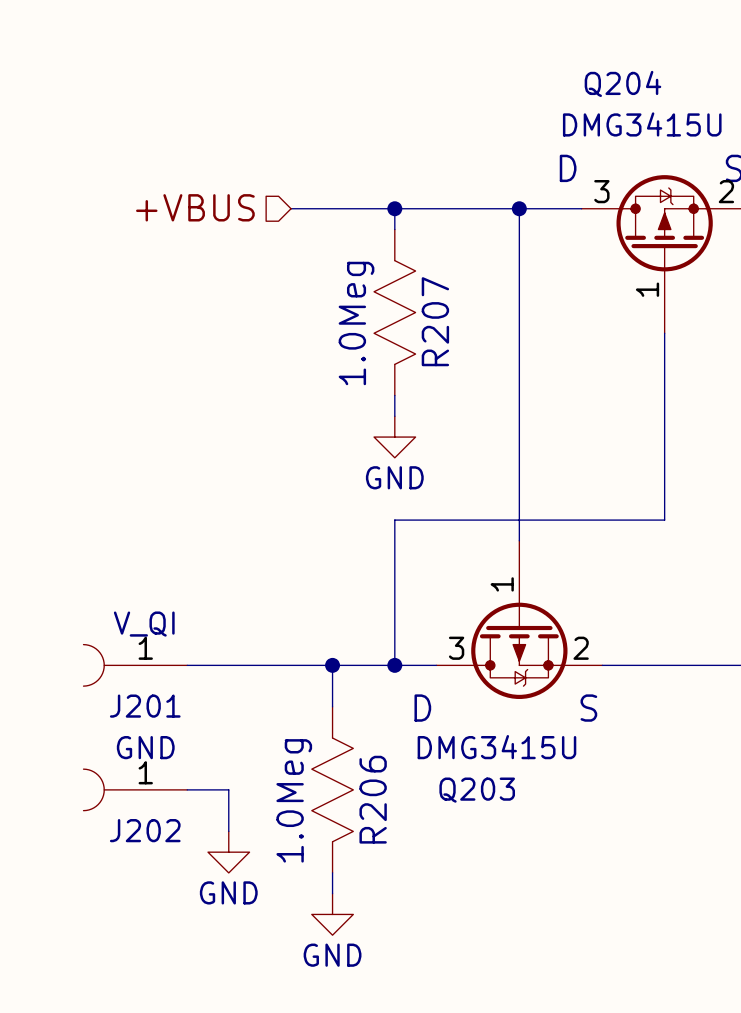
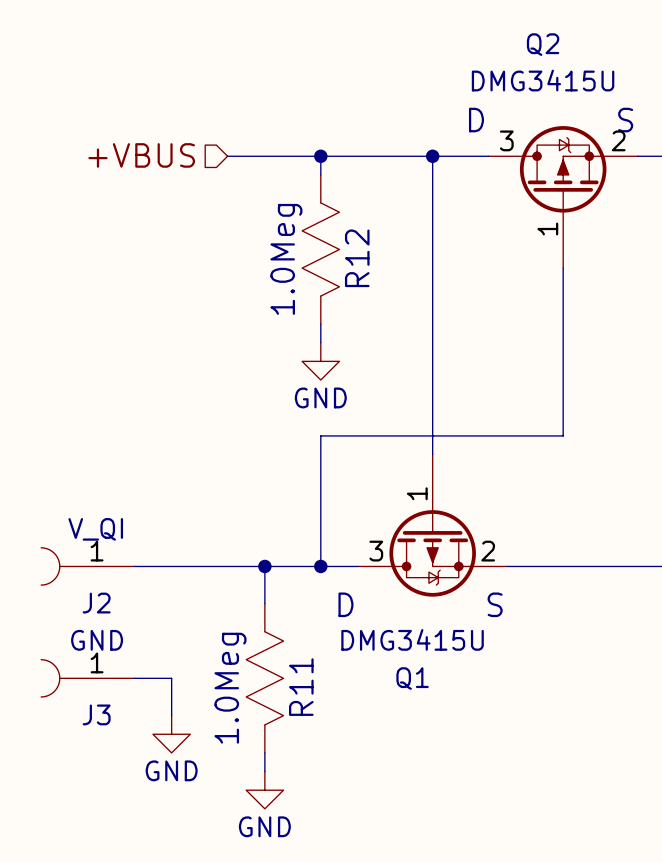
Q204 name: Q204 (622, 83) -> Q2 (543, 44)
R207 name: R207 (435, 321) -> R12 (357, 258)
J201 name: J201 (145, 706) -> J2 (96, 603)
Q203 name: Q203 (477, 790) -> Q1 (412, 678)
R206 name: R206 (373, 799) -> R11 (301, 687)
J202 name: J202 (145, 830) -> J3 (96, 714)

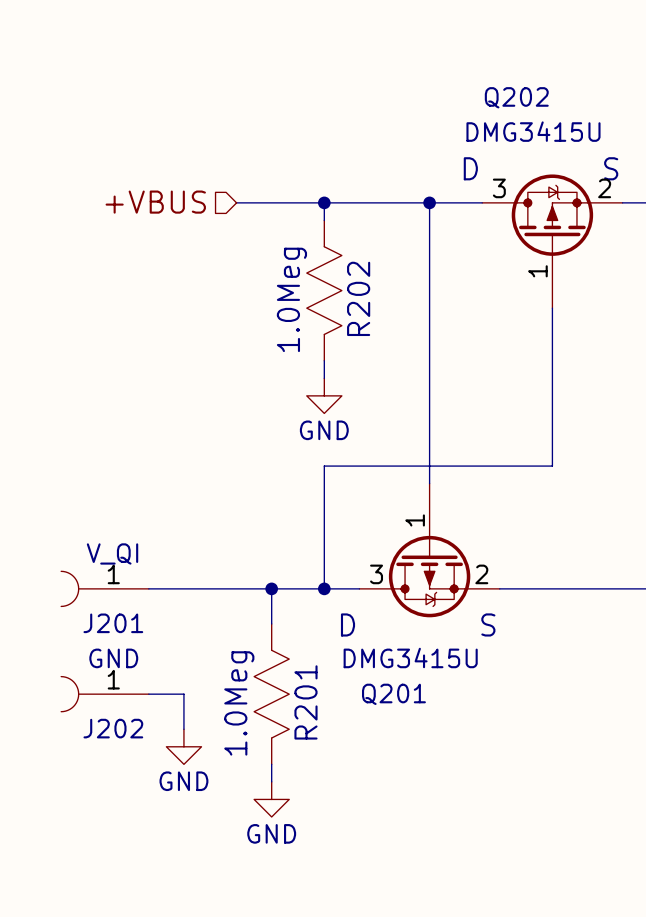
Q2 name: Q2 (543, 44) -> Q202 (516, 97)
R12 name: R12 (357, 258) -> R202 (358, 298)
J2 name: J2 (96, 603) -> J201 (113, 623)
Q1 name: Q1 (412, 678) -> Q201 (393, 694)
R11 name: R11 (301, 687) -> R201 (305, 702)
J3 name: J3 (96, 714) -> J202 (113, 728)

